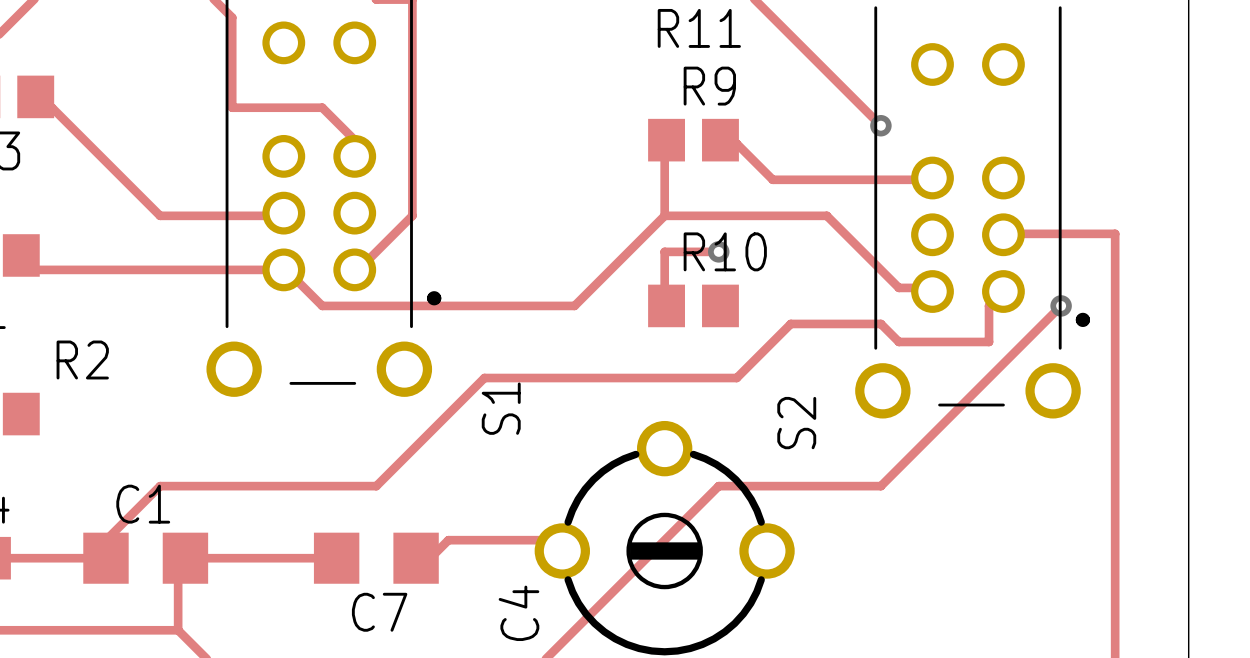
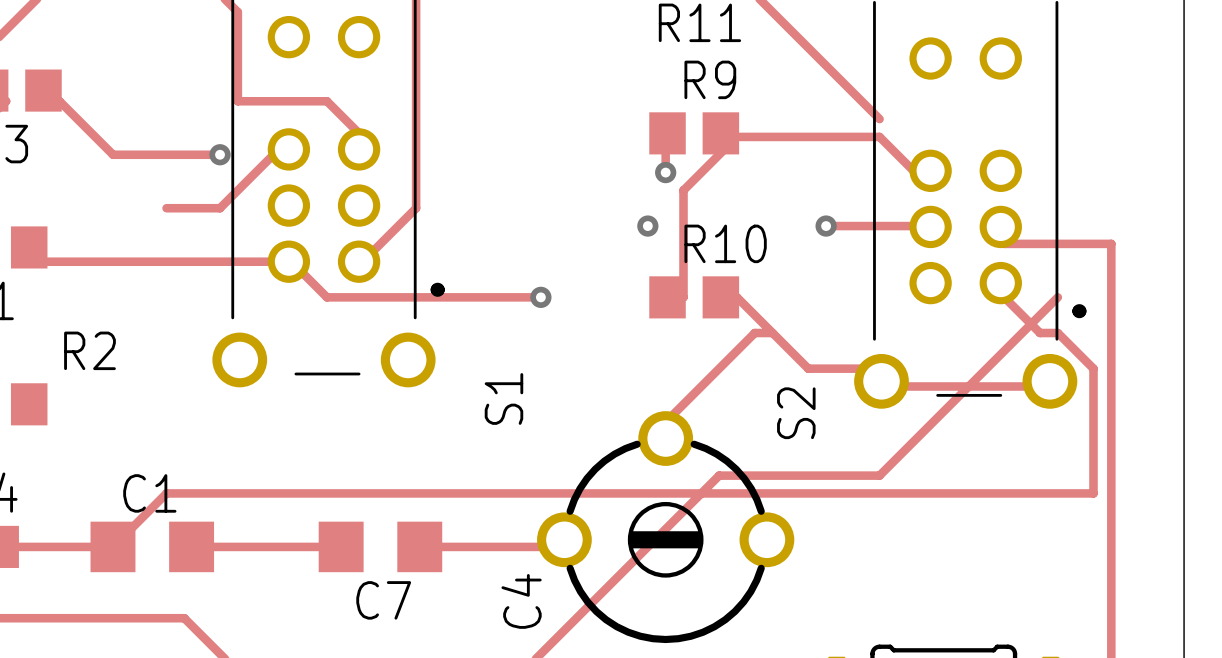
via: (880, 125) -> none
track: (736, 143) (772, 179) (916, 179) -> (667, 297) (683, 297) (683, 190) (736, 136) (879, 136) (915, 172)
track: (106, 161) (160, 215) -> (113, 154) (220, 154)
via: none -> (220, 154)
track: (664, 179) (664, 215) -> none
via: none -> (665, 172)
track: (283, 213) (268, 215) (214, 215) -> (288, 149) (273, 154) (220, 208)
track: (664, 215) (826, 215) (898, 287) (916, 287) (932, 291) -> none
track: (664, 215) (574, 305) (538, 305) -> none
via: none -> (647, 226)
track: none -> (826, 226) (930, 226)
via: none -> (826, 226)
track: (1003, 234) (1115, 233) (1115, 251) -> (1000, 226) (1004, 243) (1111, 243)
track: (718, 251) (664, 251) (664, 305) (666, 305) -> none
via: (718, 251) -> none
track: (1003, 291) (989, 305) (989, 341) (898, 341) (880, 323) (790, 323) (736, 378) (484, 378) (376, 486) (160, 486) (88, 558) -> (1000, 283) (1004, 297) (1040, 333) (1057, 333) (1093, 368) (1093, 493) (166, 493) (113, 546)
via: none -> (540, 297)
track: none -> (720, 297) (736, 297) (808, 368) (879, 368) (881, 381) (897, 386) (1040, 386) (1049, 381)
via: (1061, 305) -> none
track: none -> (772, 333) (754, 333) (665, 422) (665, 438)
track: (562, 551) (556, 540) (448, 540) (430, 558) -> (564, 539) (558, 546) (433, 546)
track: (185, 558) (178, 558) (178, 630) -> none

